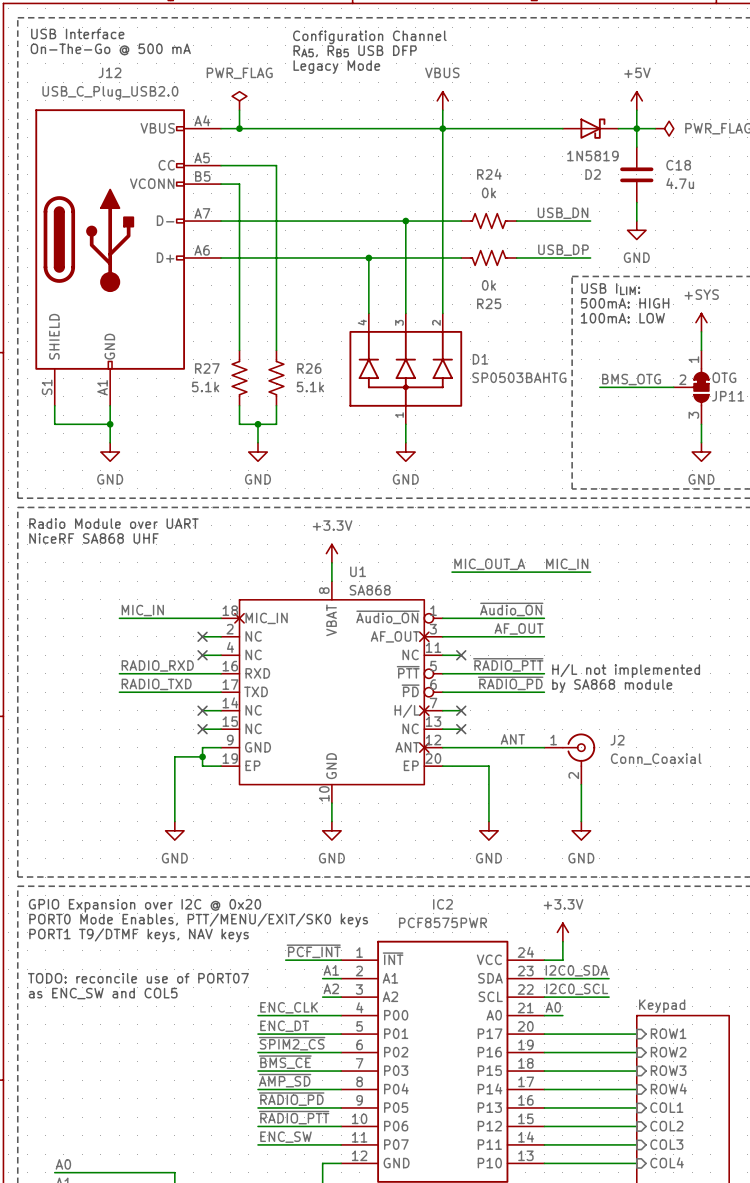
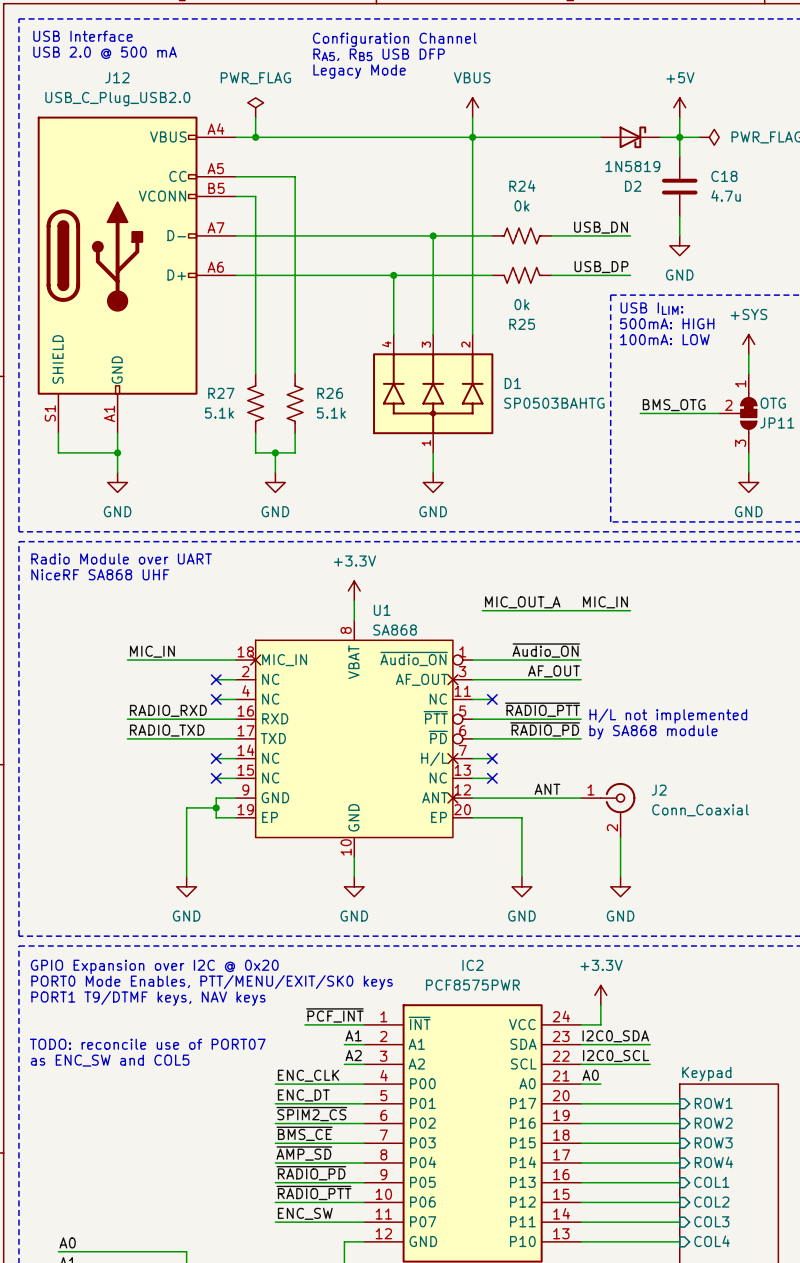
text: On-The-Go @ 500 mA (110, 49) -> USB 2.0 @ 500 mA (105, 52)

